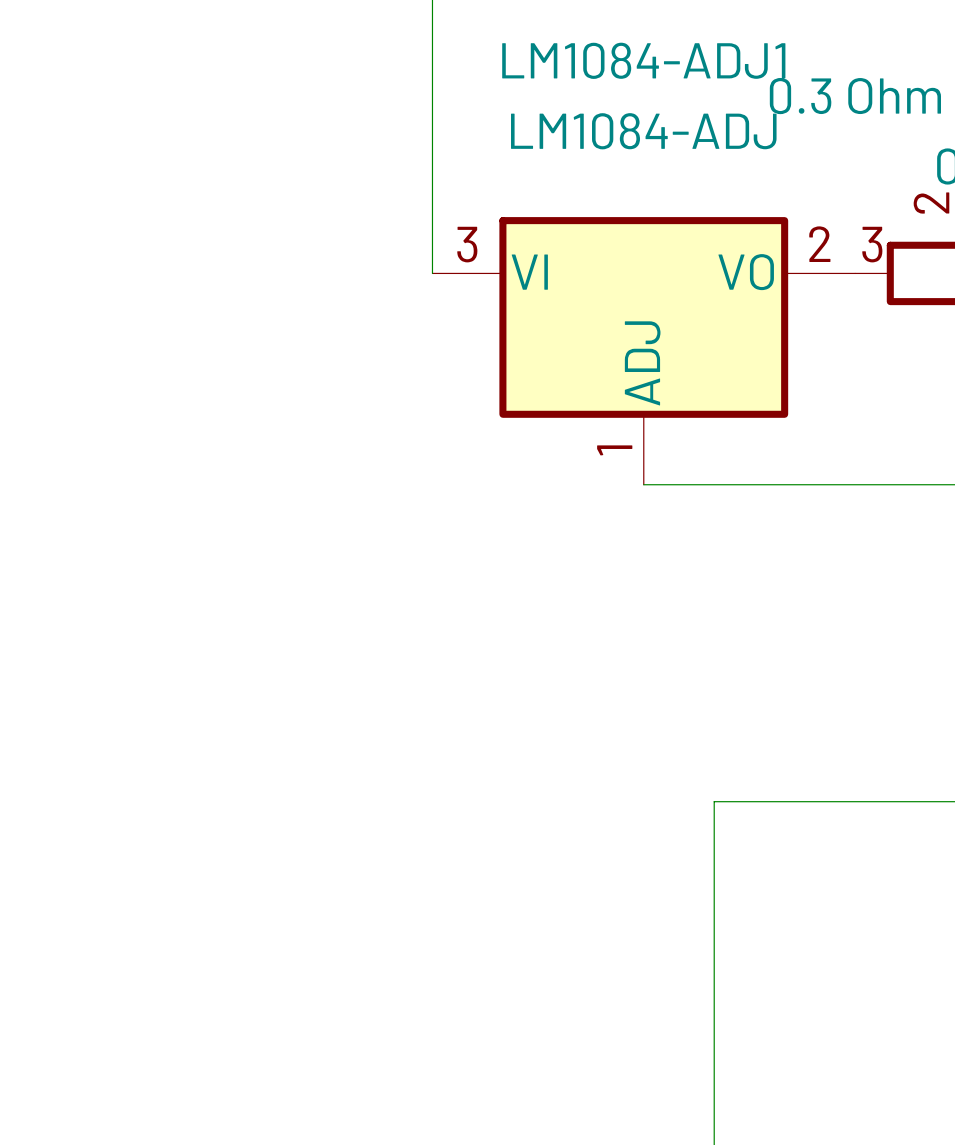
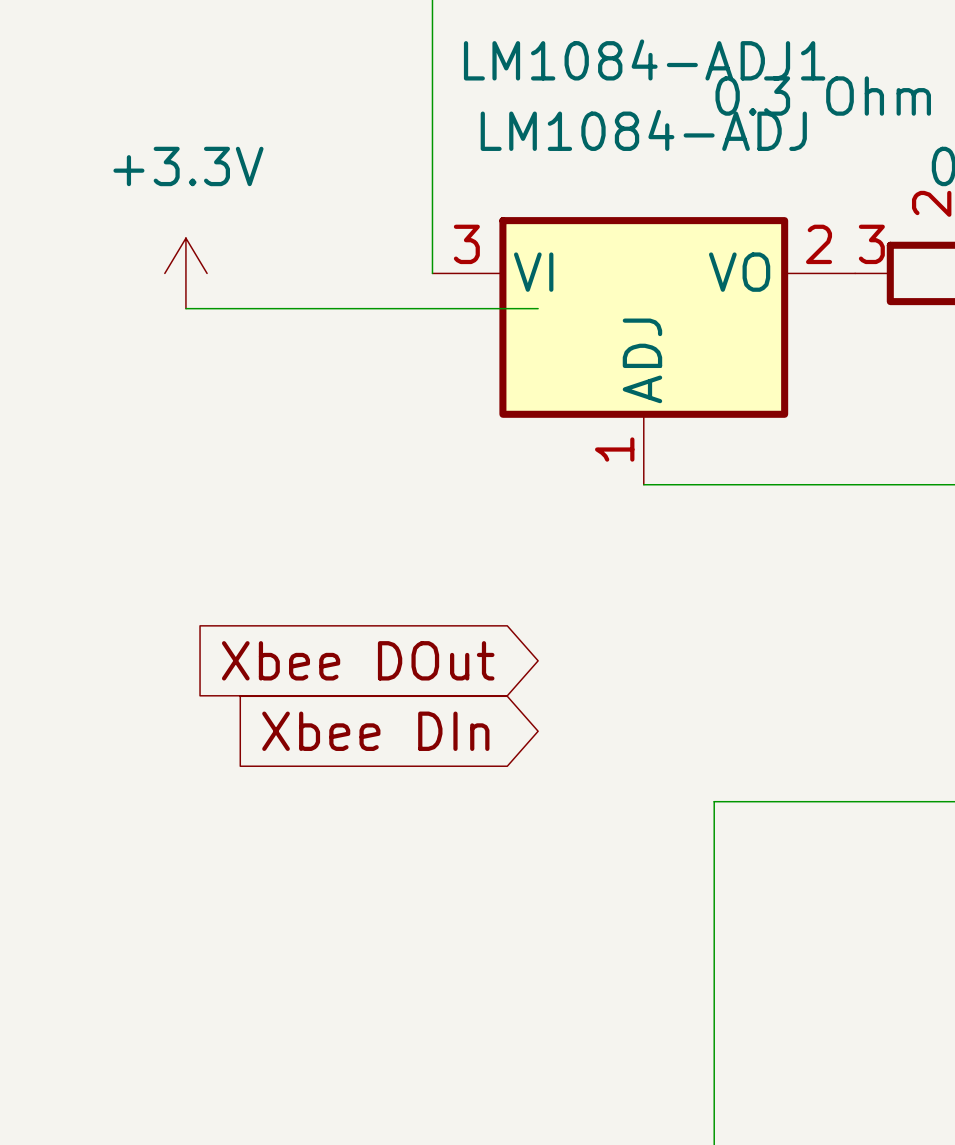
power symbol: none -> +3.3V (185, 273)
wire: none -> (185, 308) (538, 308)
global label: none -> Xbee DOut (358, 660)
global label: none -> Xbee DIn (375, 731)

